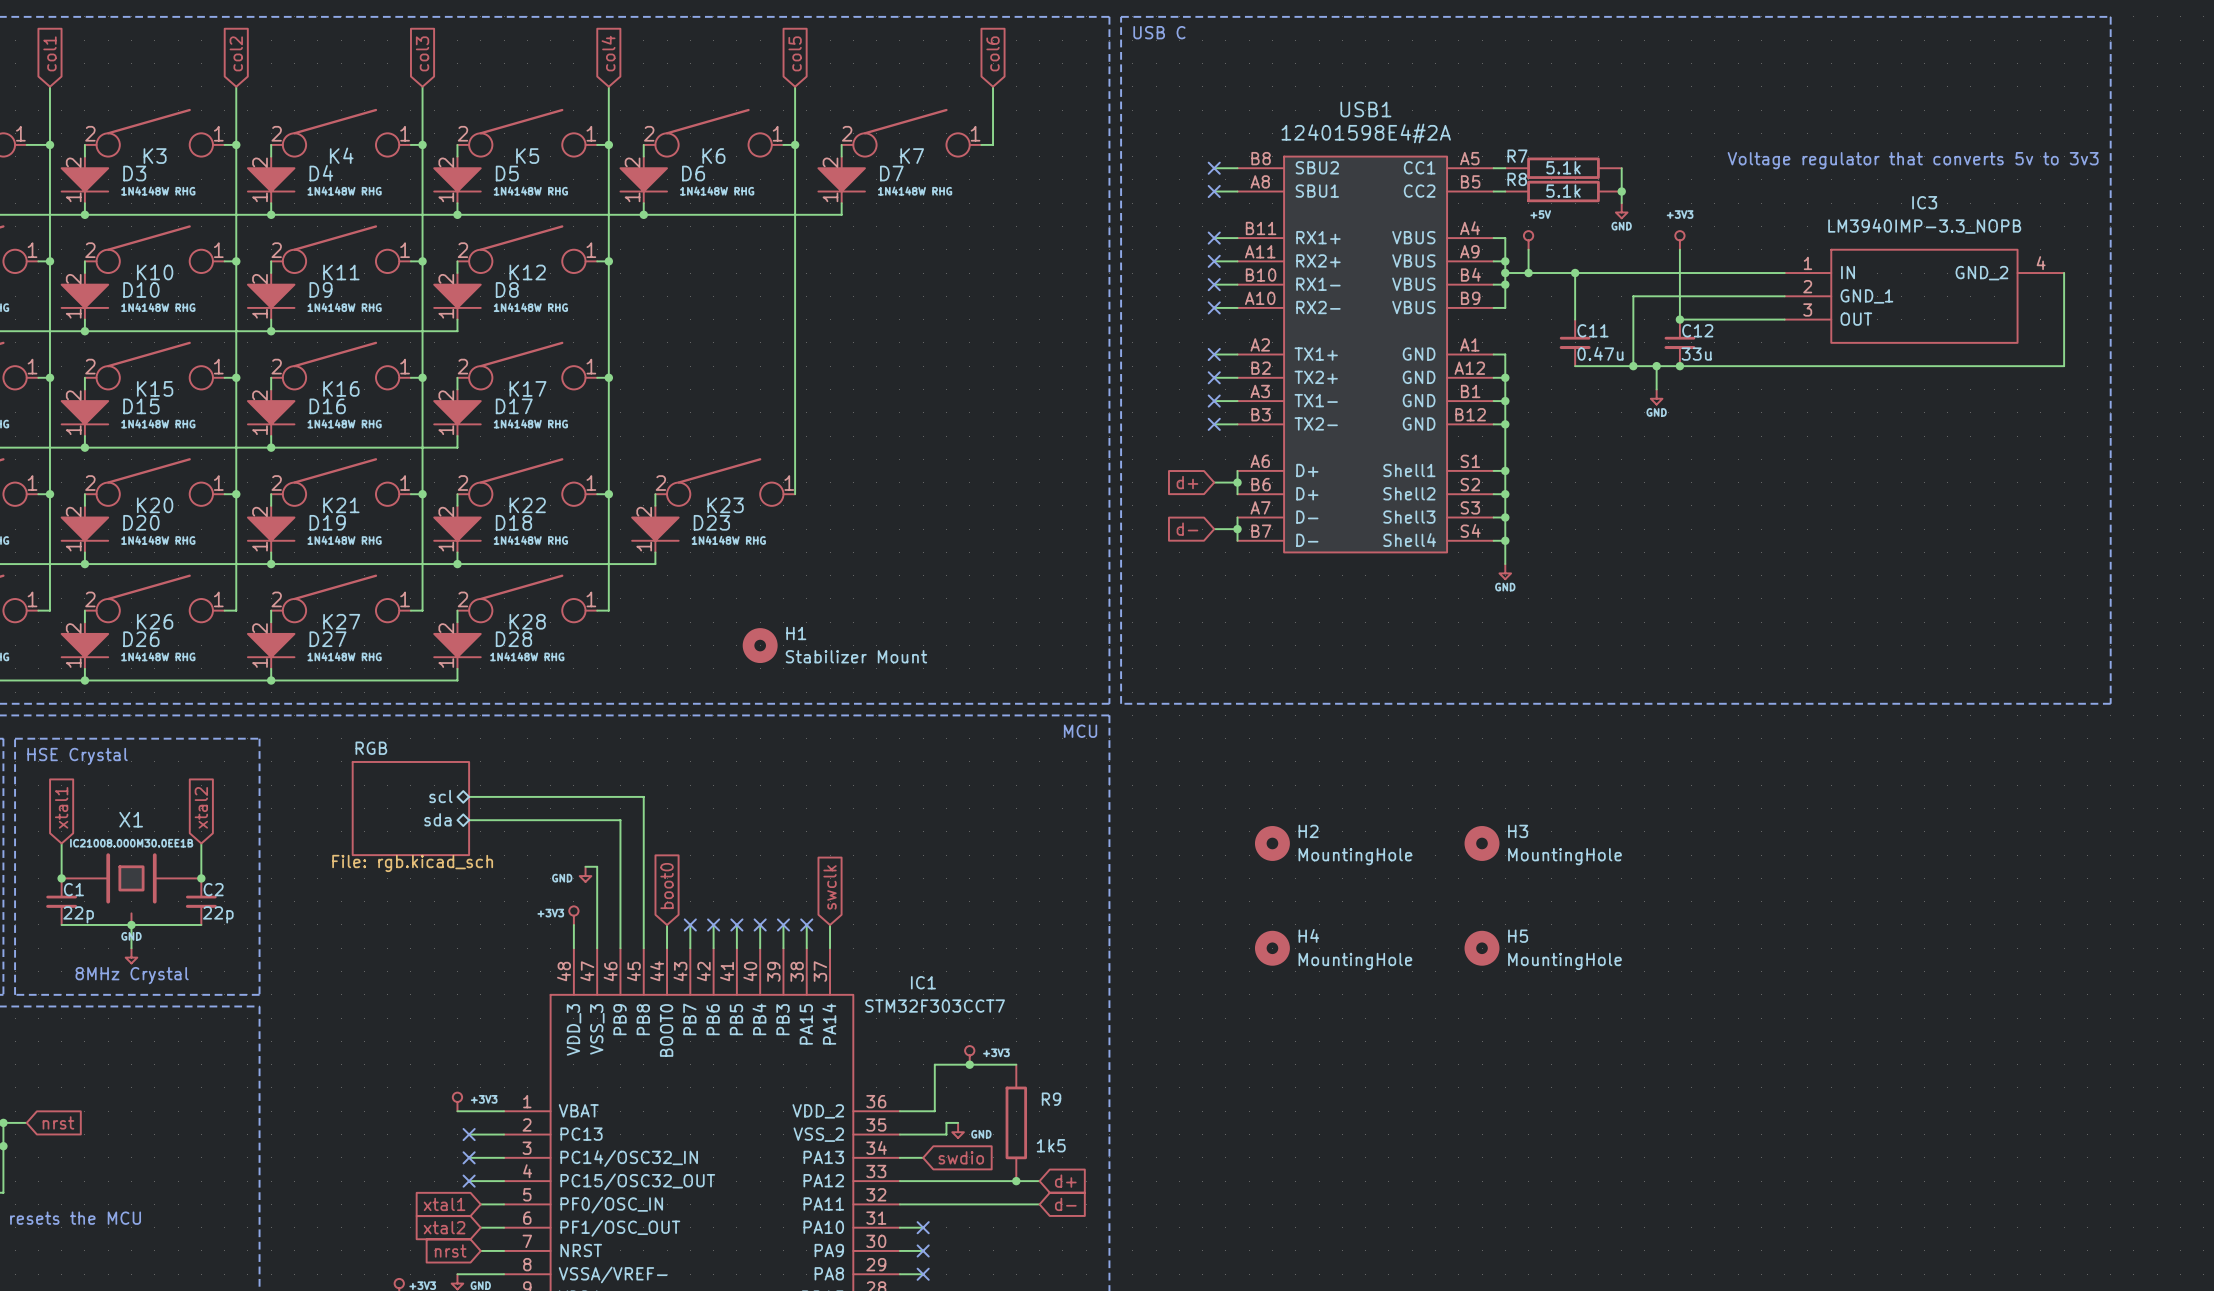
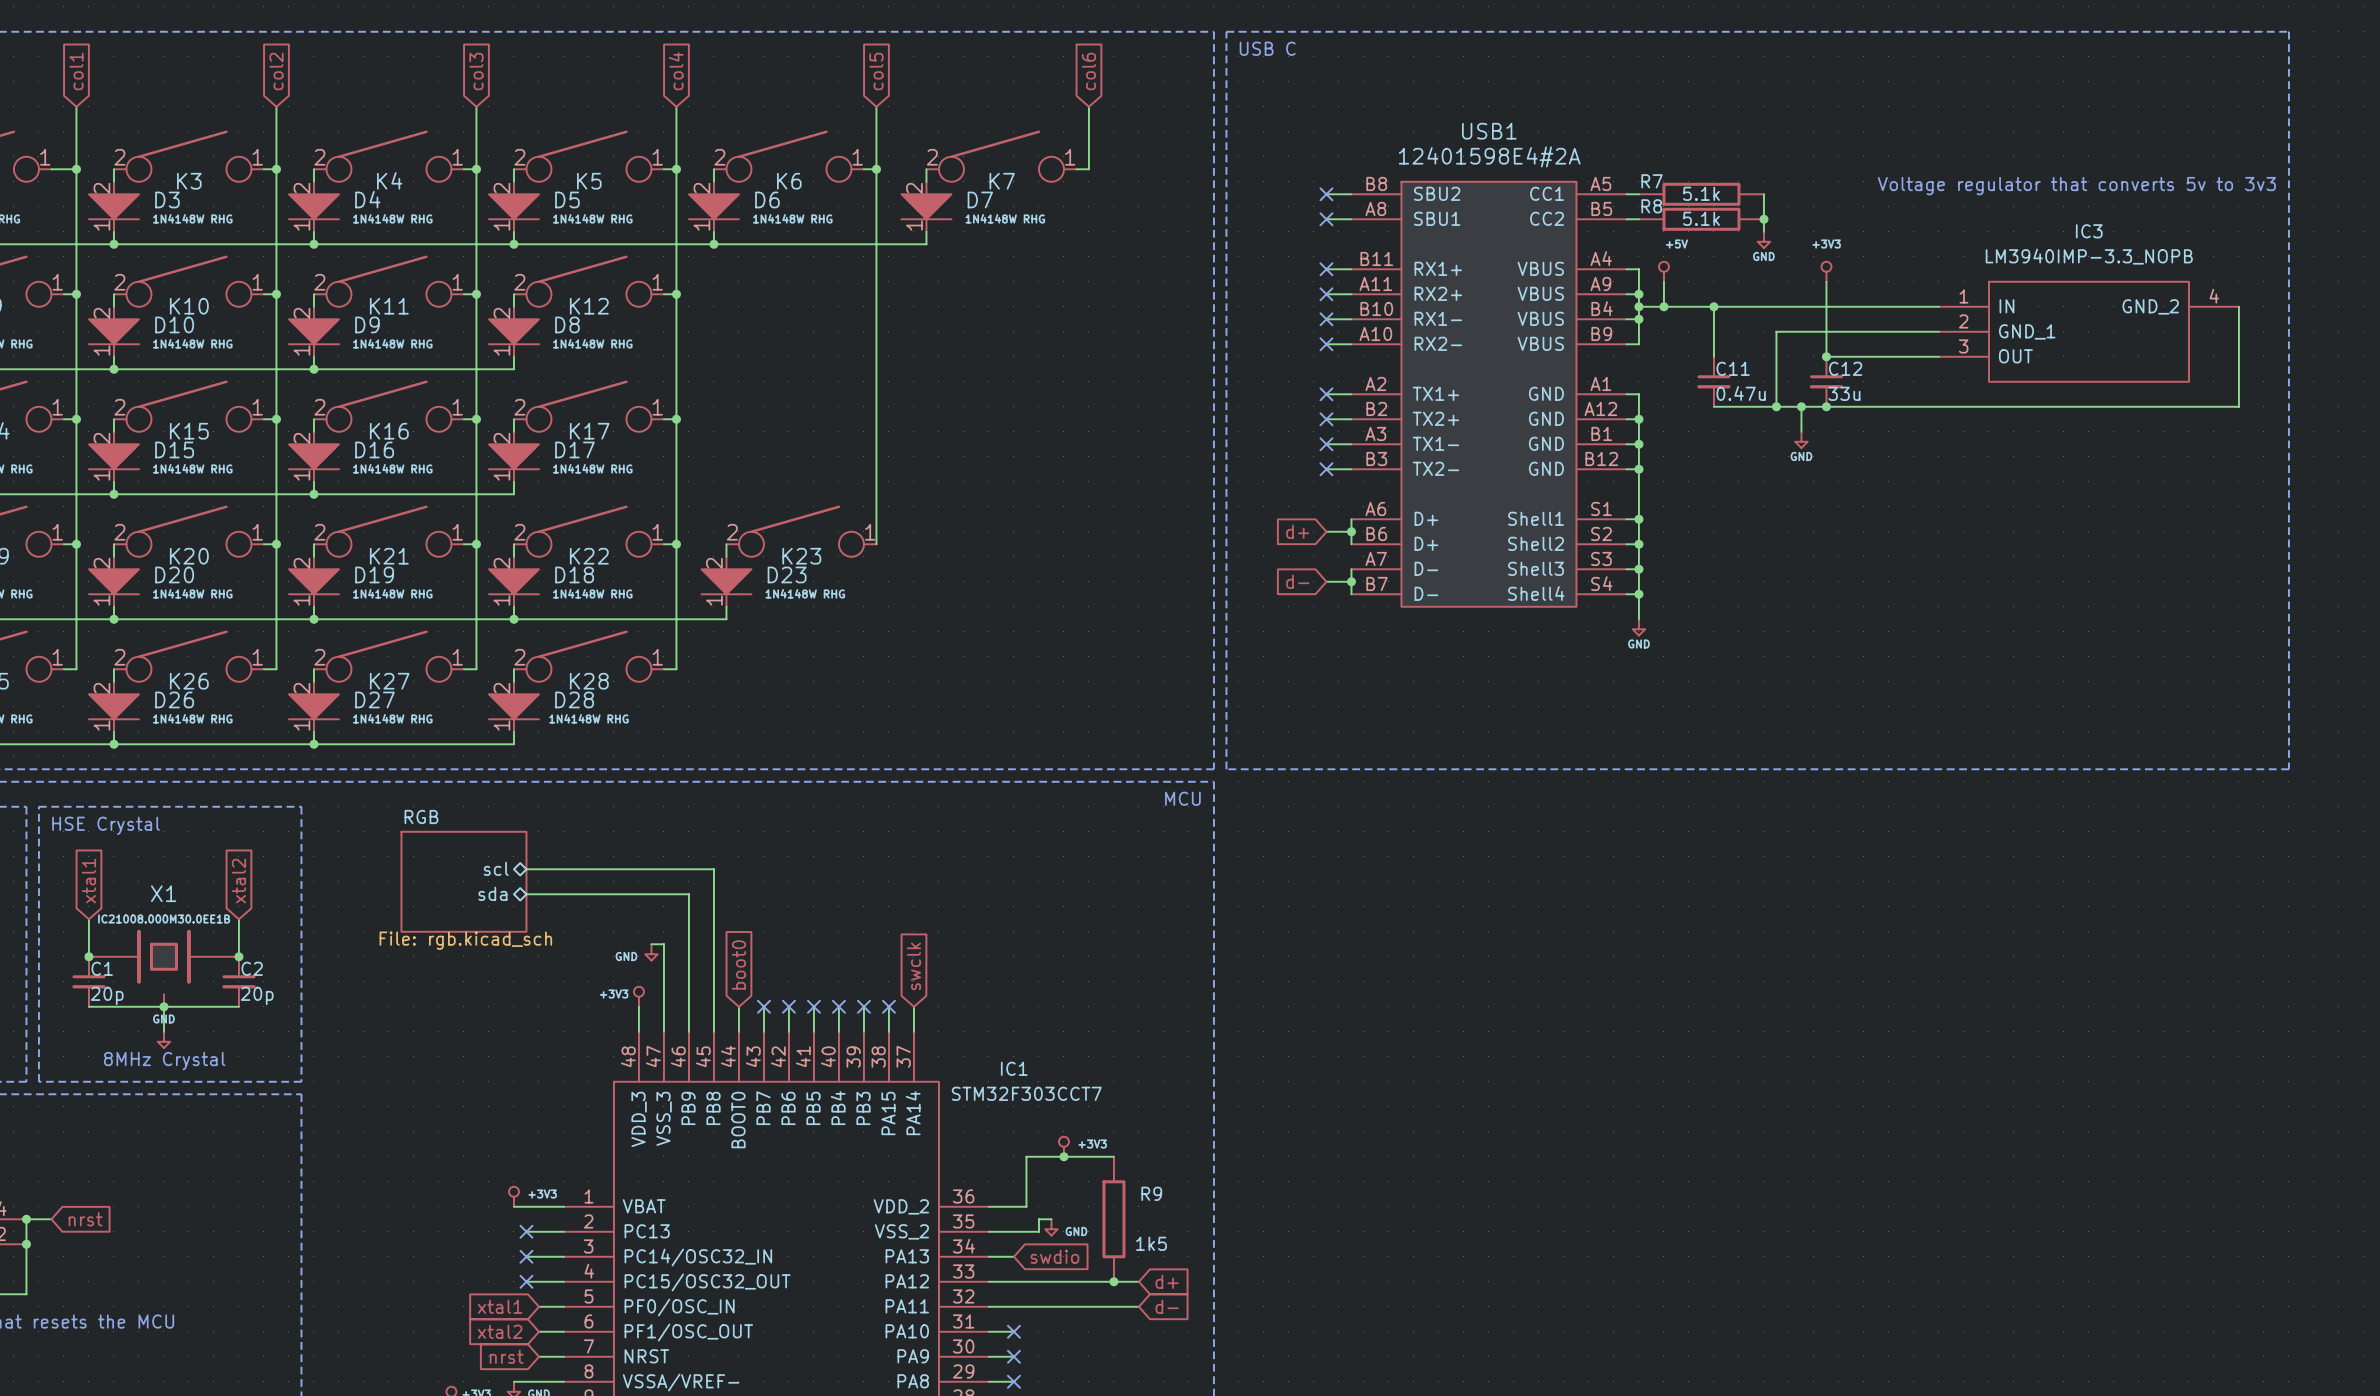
H1: Stabilizer Mount (760, 645) -> none
H2: MountingHole (1272, 843) -> none
H3: MountingHole (1482, 843) -> none
C1 value: 22p (78, 914) -> 20p (107, 995)
C2 value: 22p (218, 914) -> 20p (257, 995)
H4: MountingHole (1272, 948) -> none
H5: MountingHole (1482, 948) -> none

